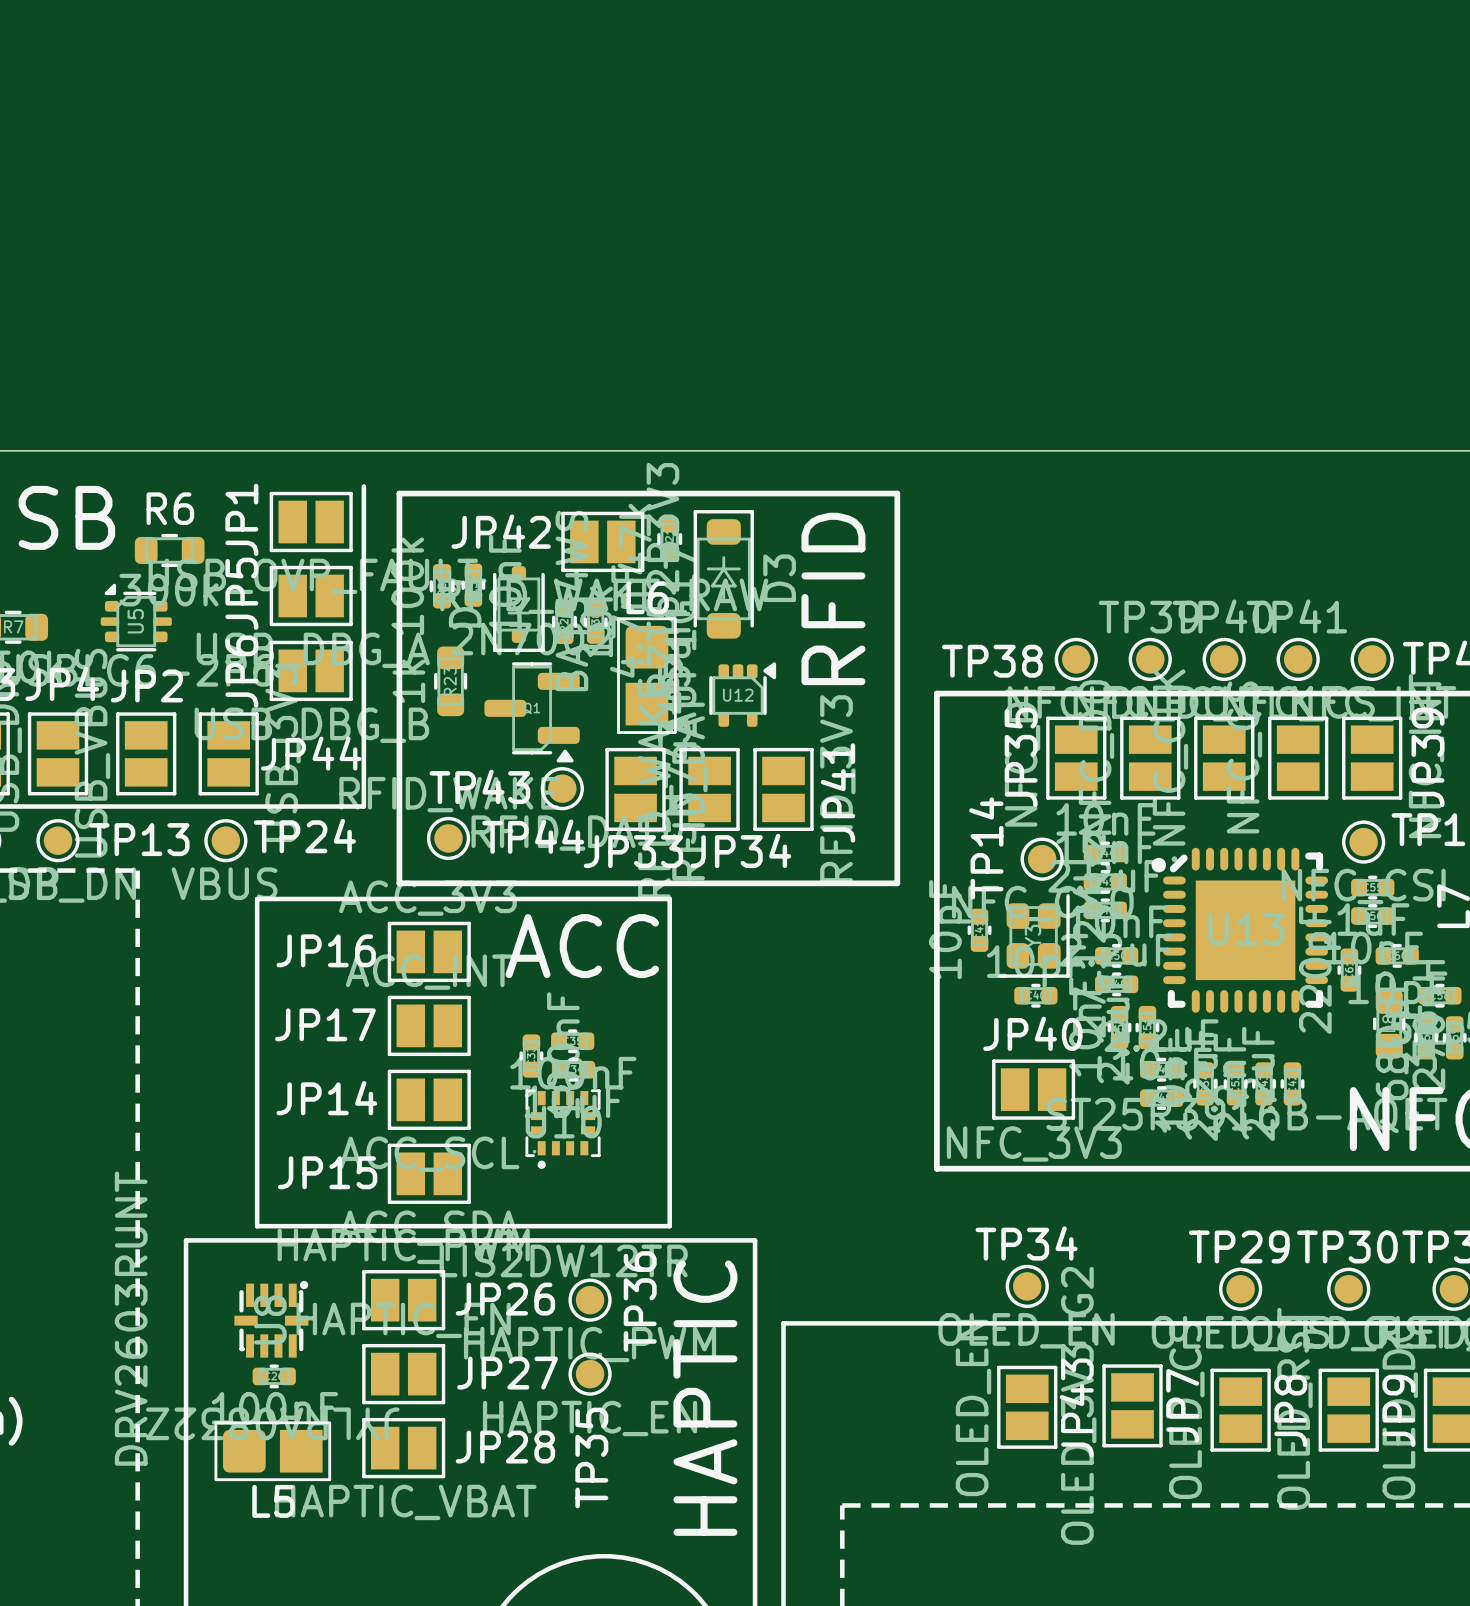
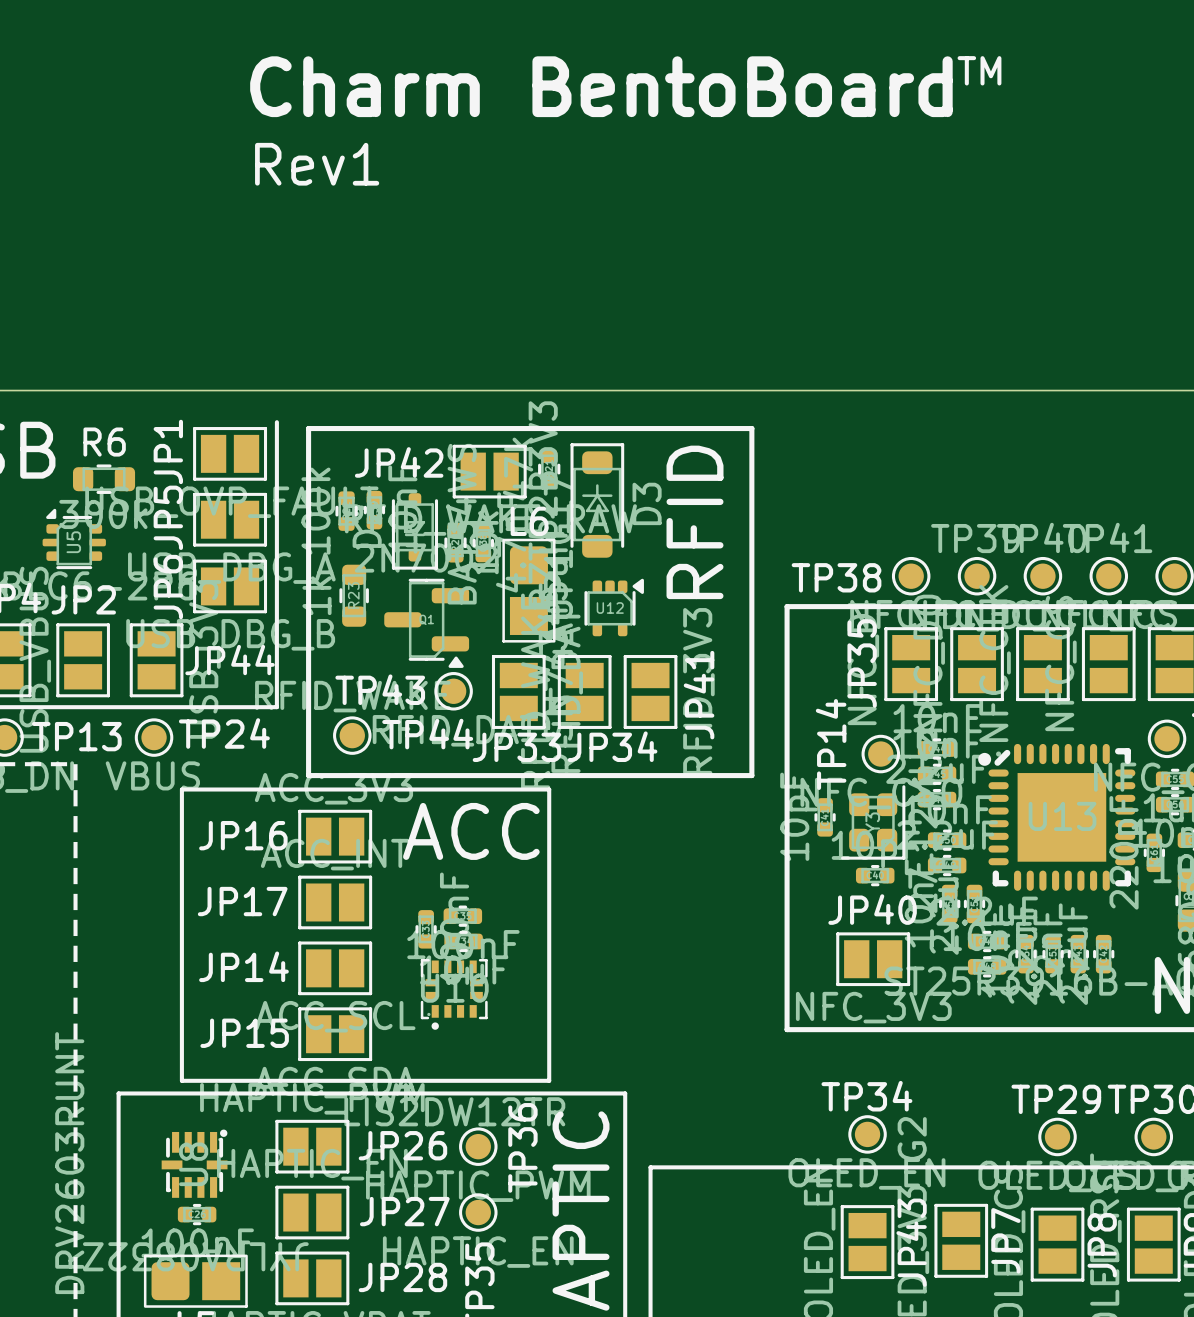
text: none -> TM (979, 70)
text: none -> Charm BentoBoard (601, 86)
text: none -> Rev1 (317, 164)

